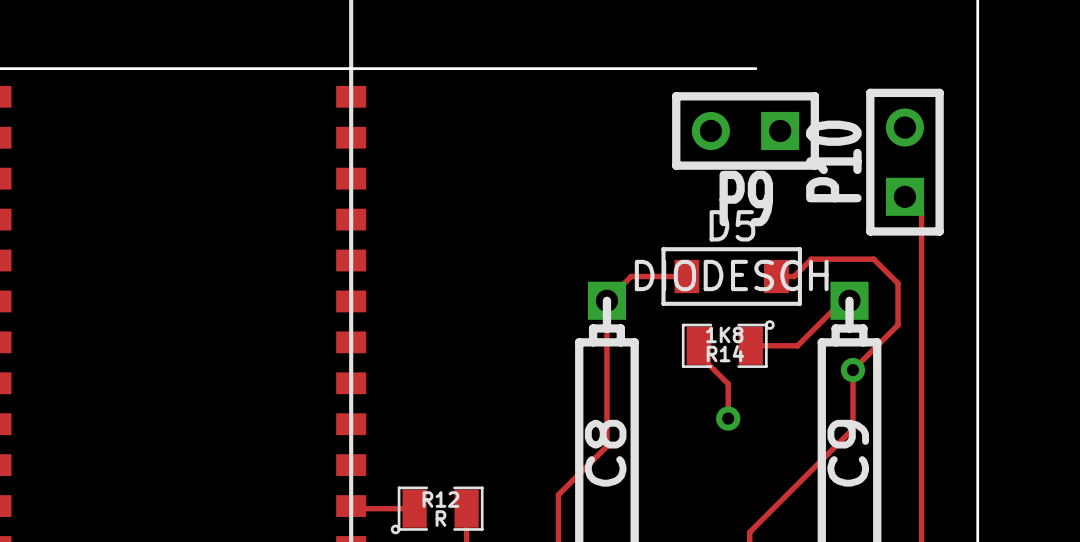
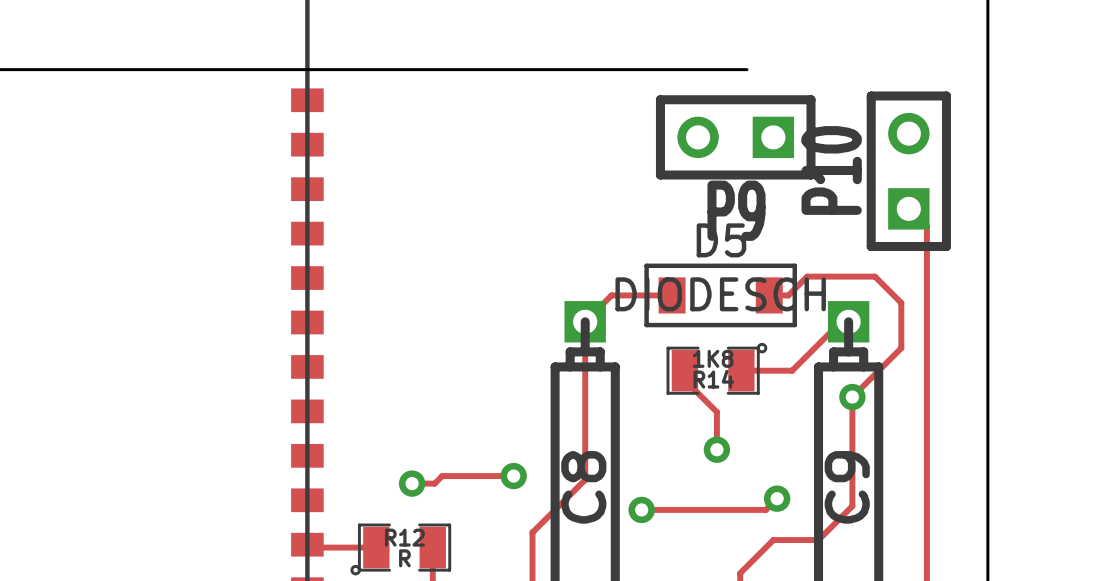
track: (852, 428) (780, 501) -> (852, 461) (852, 506) (818, 540) (773, 540)
track: none -> (513, 476) (442, 476) (434, 483) (412, 483)
via: none -> (513, 476)
via: none -> (412, 483)
track: none -> (777, 498) (765, 509) (641, 509)
via: none -> (777, 498)
via: none -> (641, 509)

